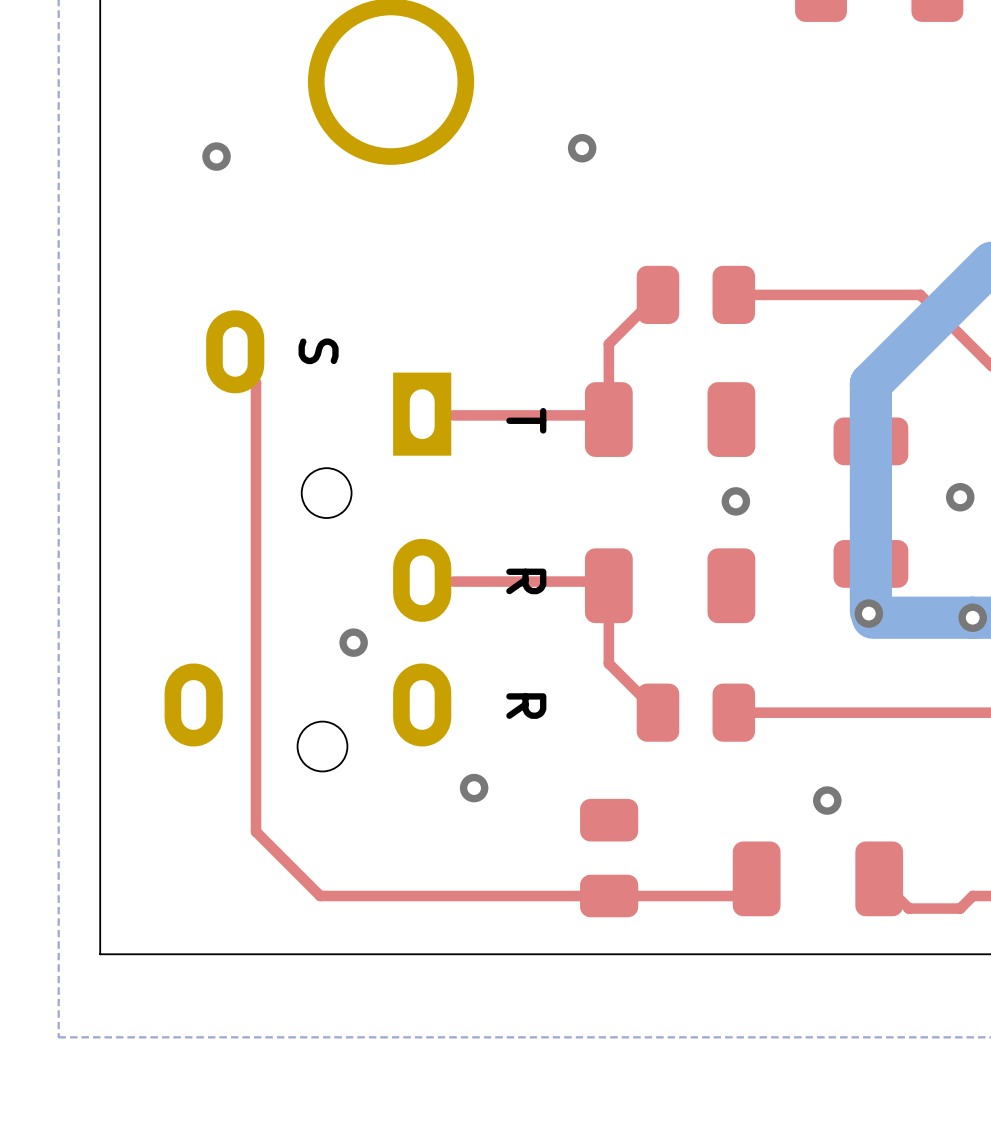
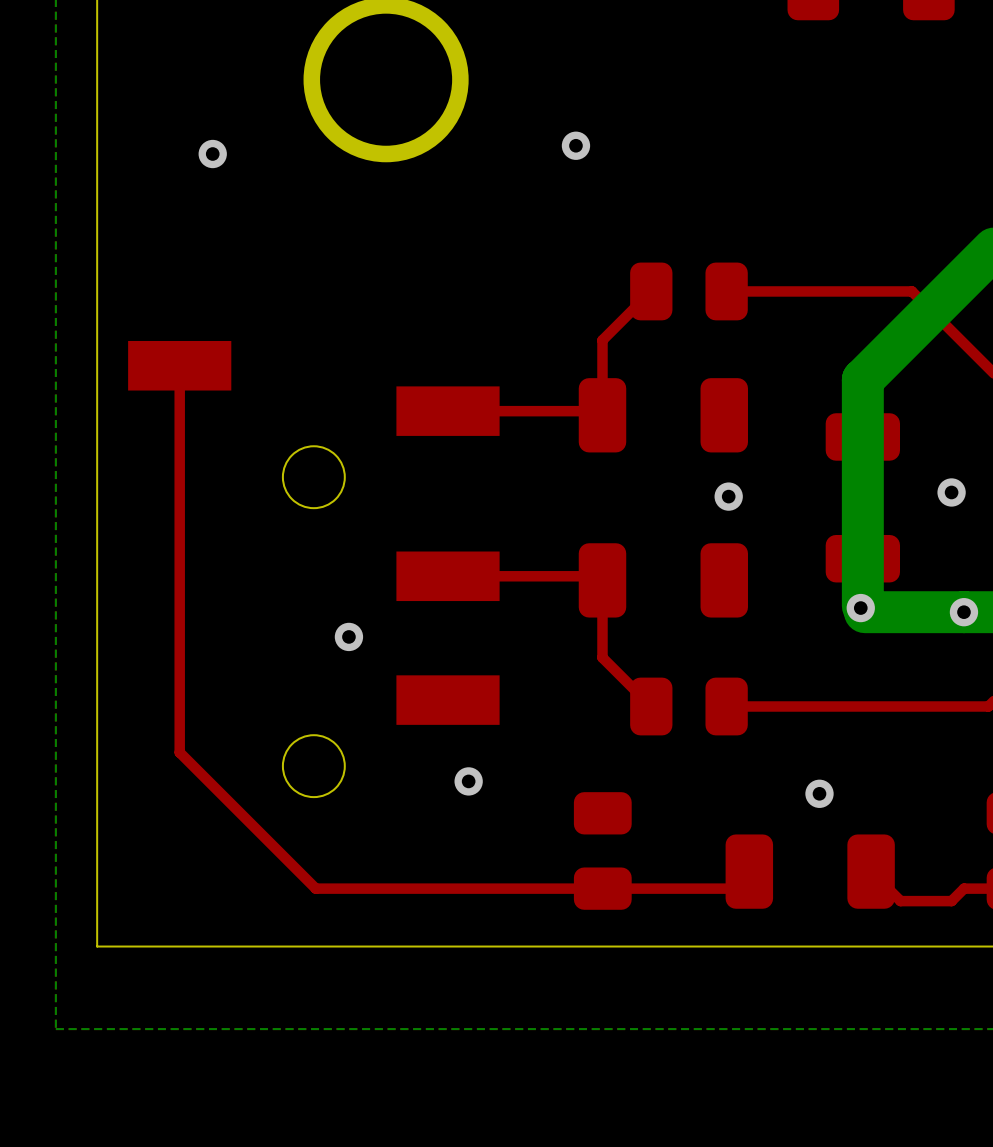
part footprint: [164, 310, 452, 772] -> [128, 340, 500, 798]
text: S (318, 351) -> none
top track: (235, 362) (256, 382) (256, 831) -> (179, 365) (179, 752) (251, 824)
text: T (526, 420) -> none
text: R (526, 581) -> none
text: R (526, 706) -> none

